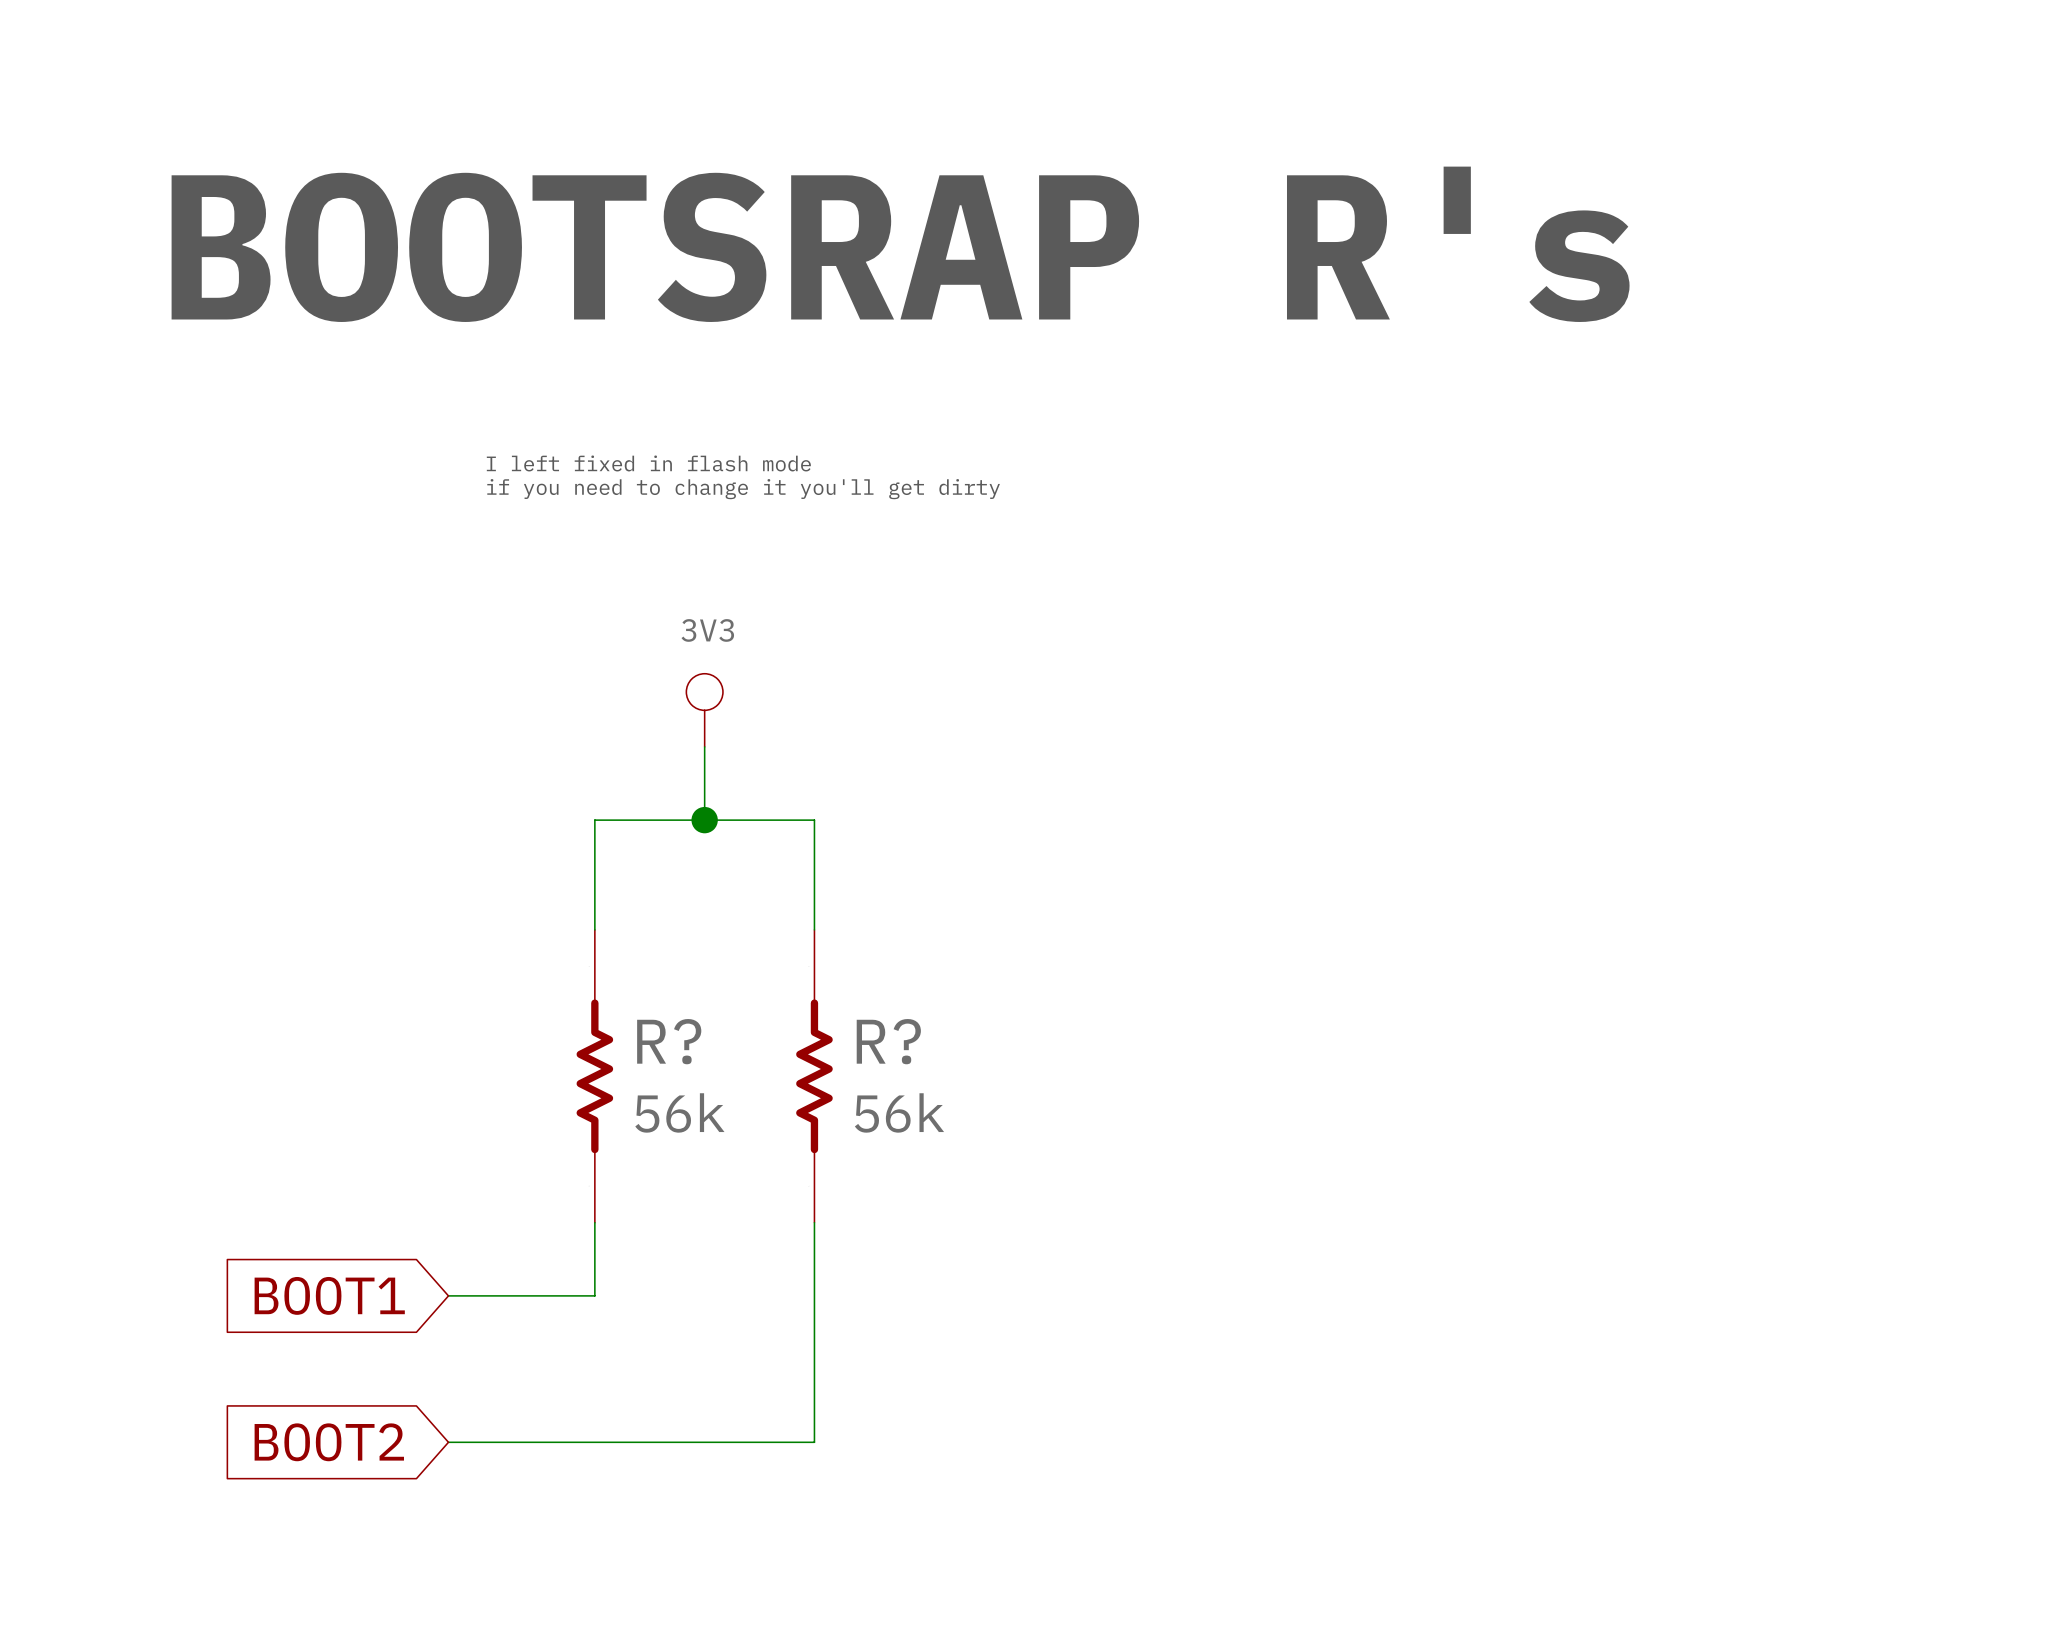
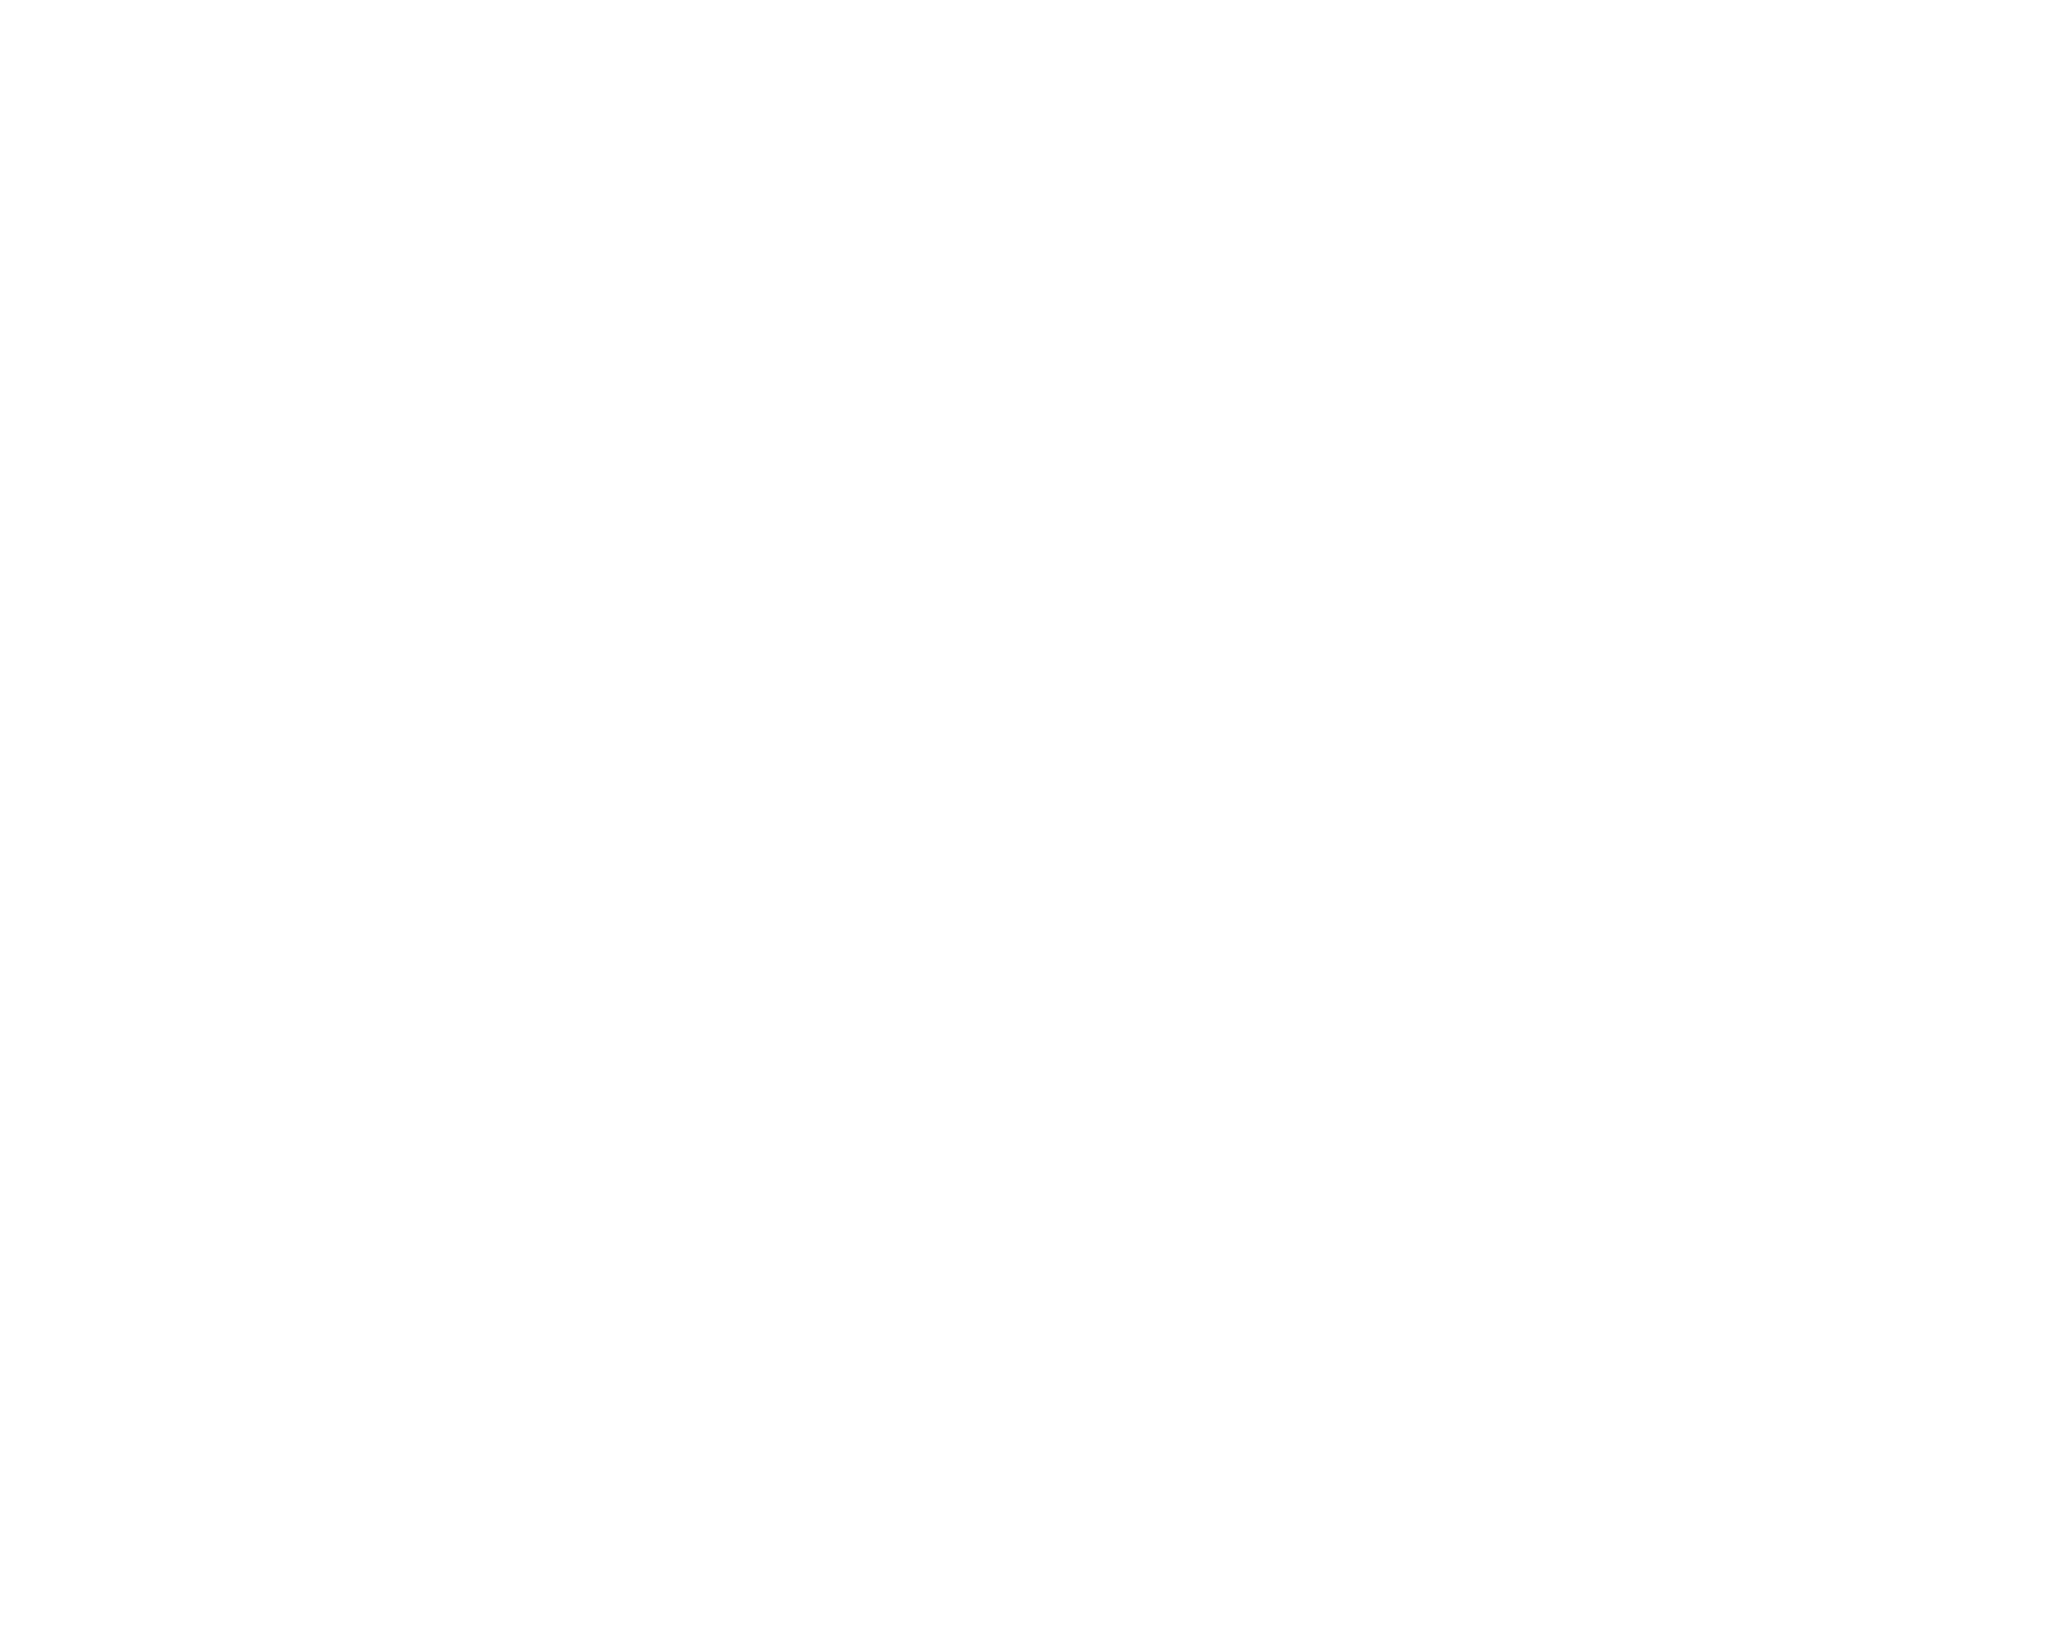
text: BOOTSRAP R's (900, 244) -> none
text: I left fixed in flash mode (648, 463) -> none
text: if you need to change it you'll get dirty (743, 489) -> none
power symbol: 3V3 (704, 710) -> none
wire: (704, 746) (704, 820) -> none
junction: (704, 820) -> none
wire: (594, 929) (594, 820) (814, 820) (814, 929) -> none
R?: 56k (594, 1076) -> none
R?: 56k (814, 1076) -> none
wire: (594, 1222) (594, 1295) (448, 1295) -> none
wire: (814, 1222) (814, 1442) (448, 1442) -> none
global label: BOOT1 (329, 1295) -> none
global label: BOOT2 (329, 1442) -> none

